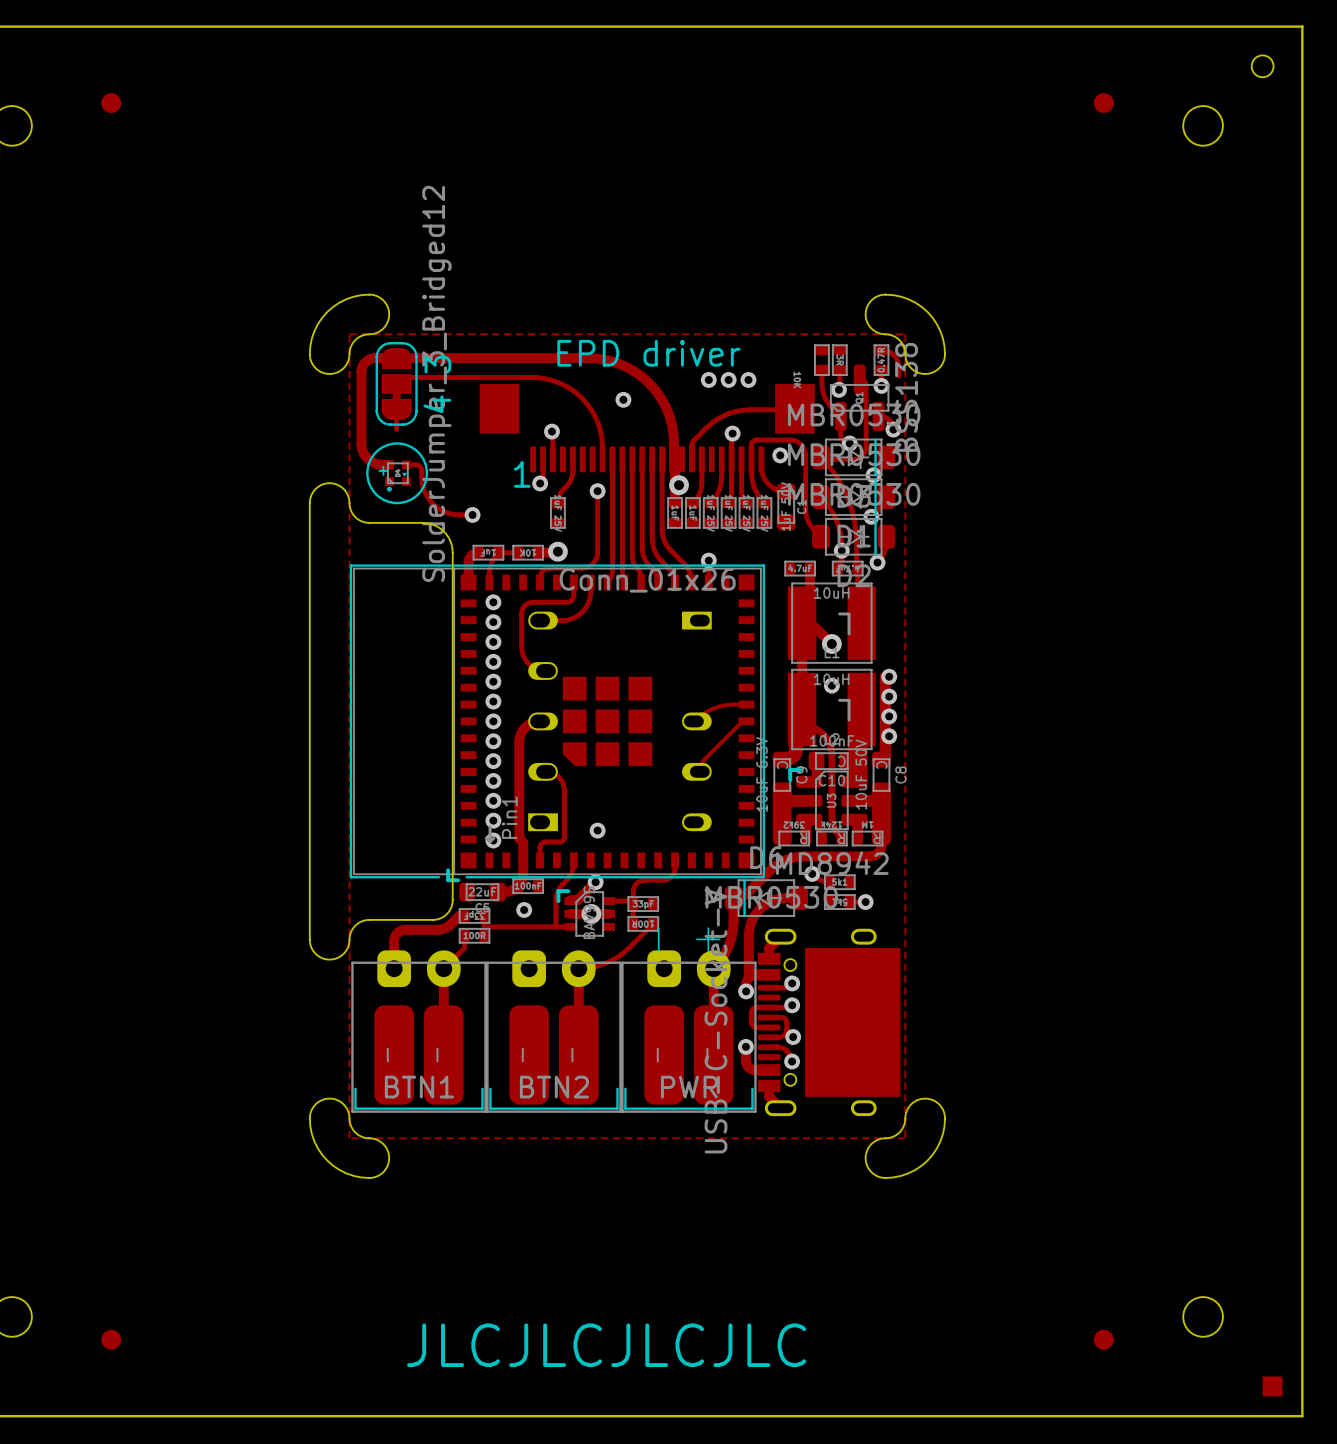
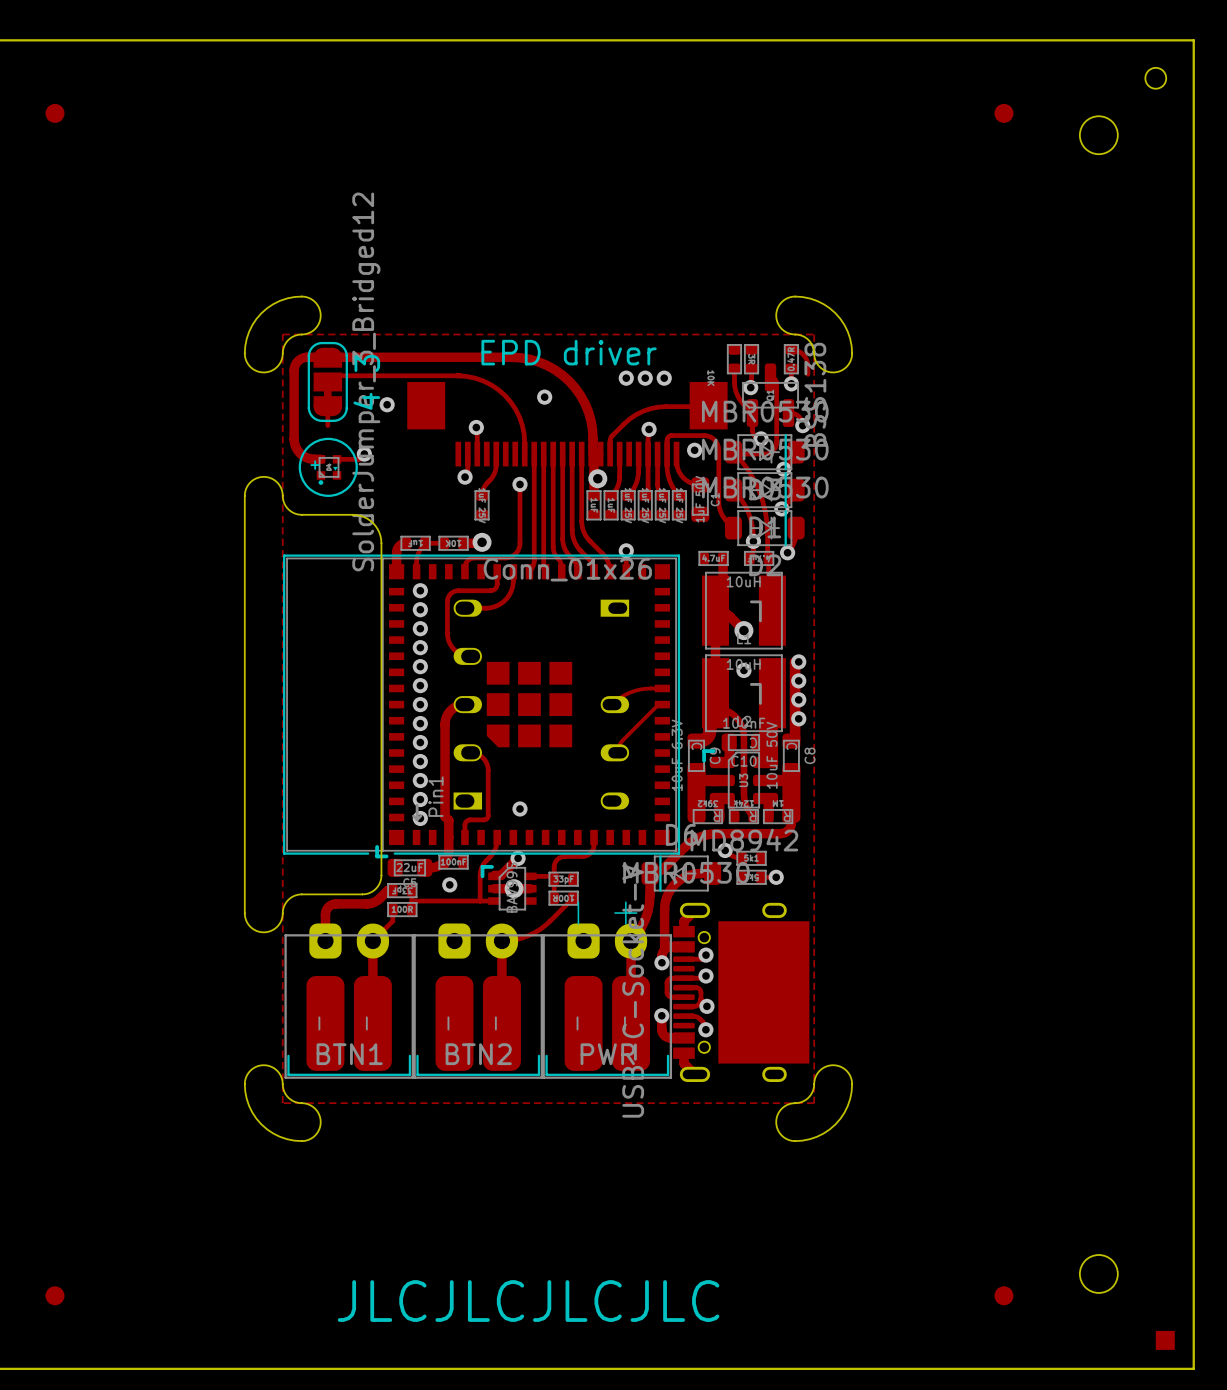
via: none -> (387, 404)
via: none -> (364, 454)
track: (415, 464) (421, 468) (425, 493) (436, 506) (451, 514) (472, 514) -> (346, 459) (360, 459) (364, 454)
text: 1 (522, 474) -> none
via: (472, 514) -> none

